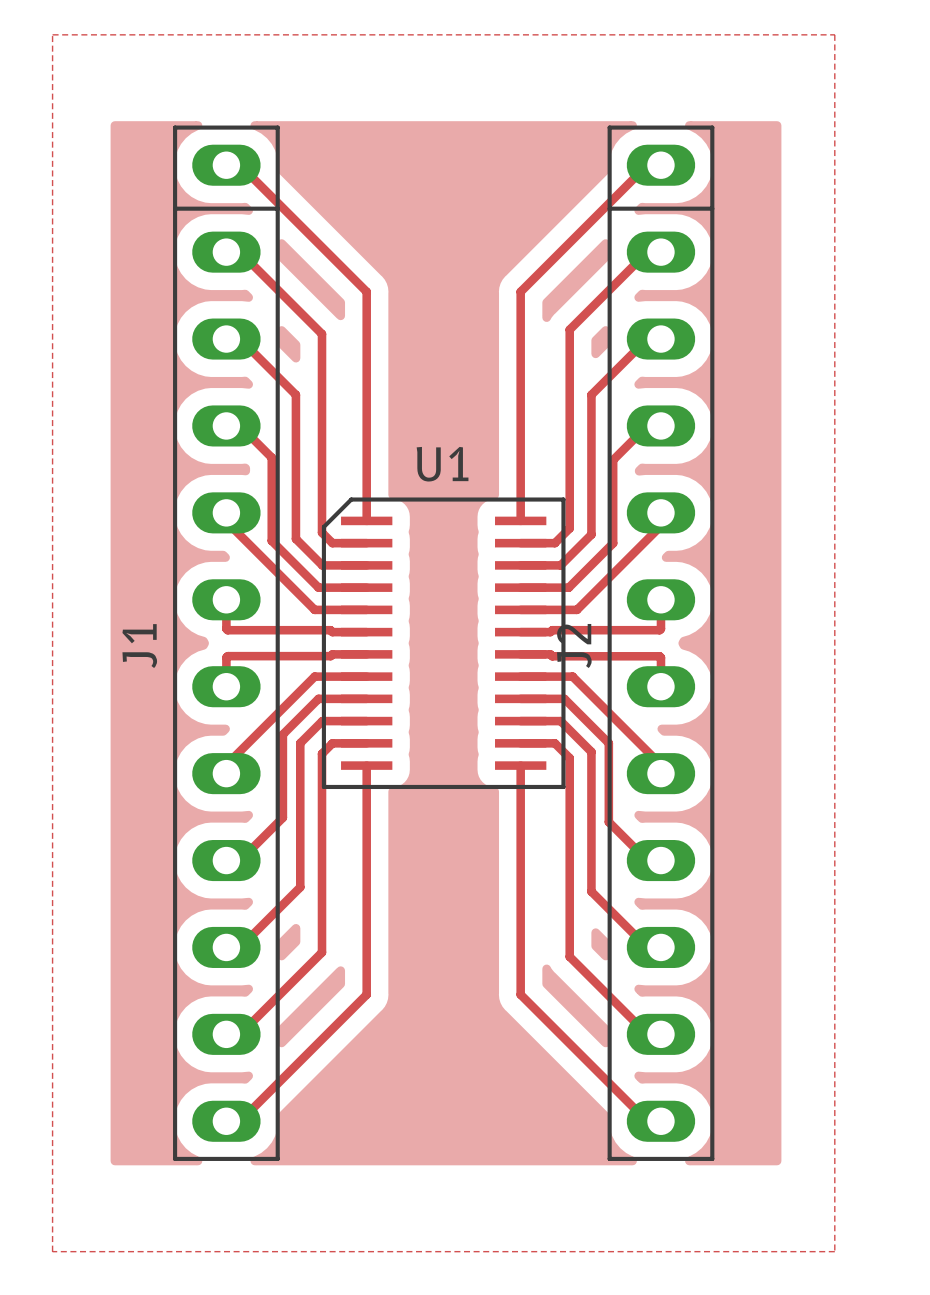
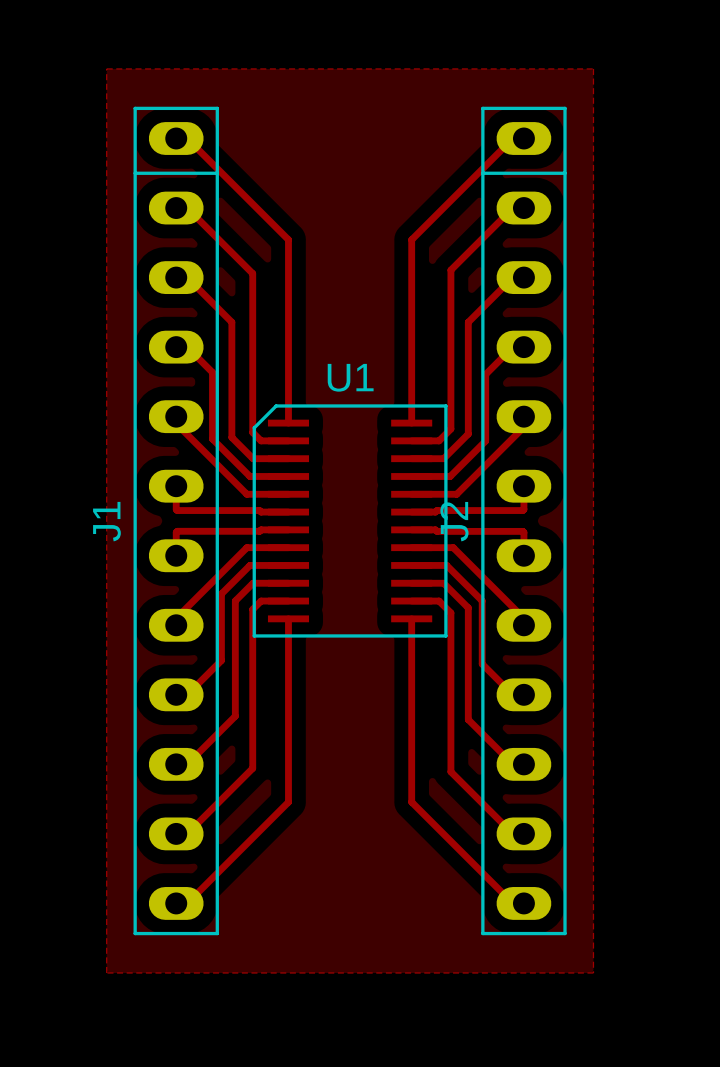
top zone outline: (52, 34) (834, 34) (834, 1251) (52, 1251) (52, 34) -> (106, 68) (106, 972) (593, 972) (593, 68) (106, 68)

